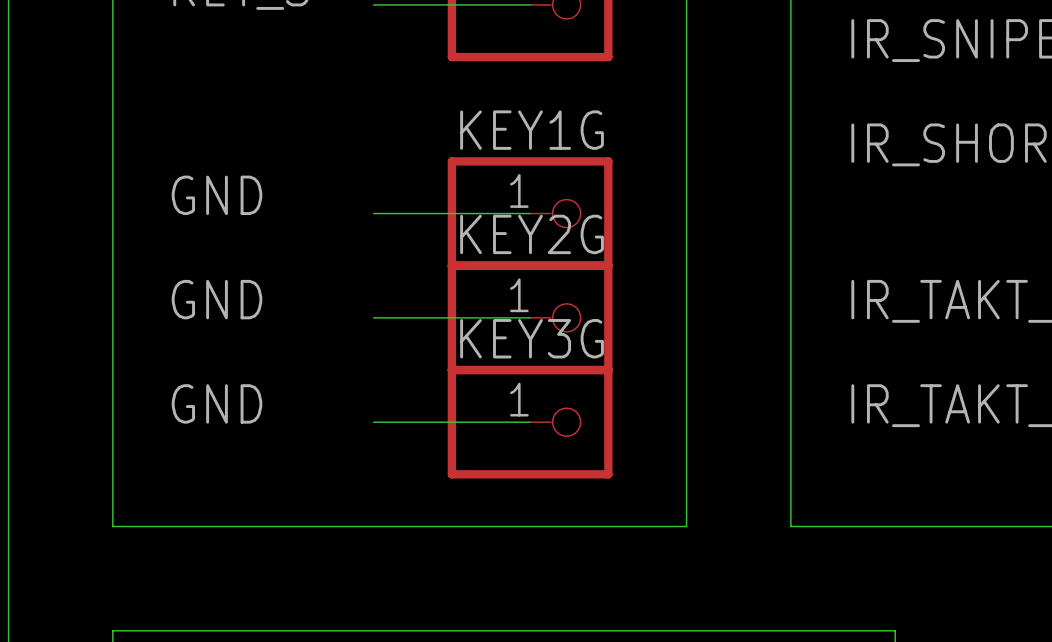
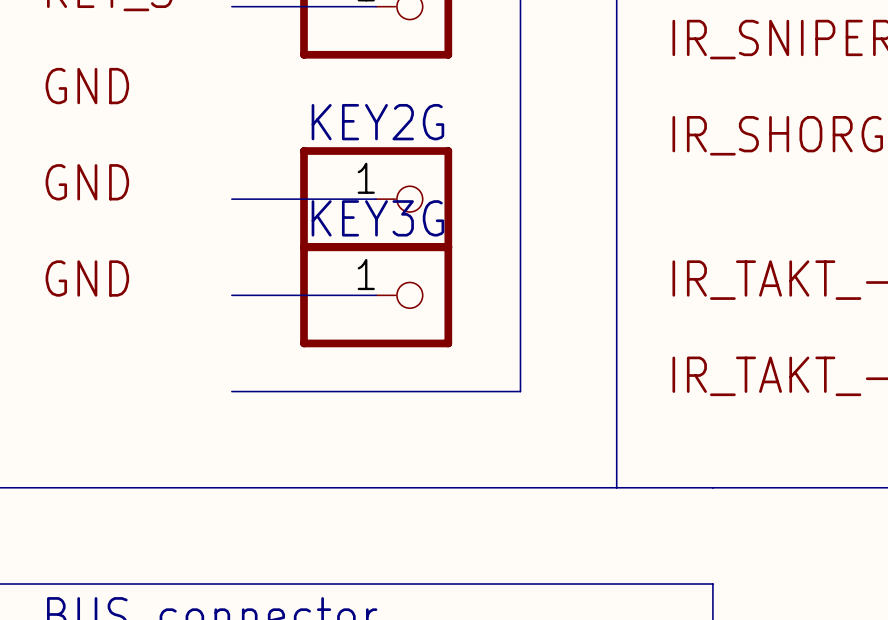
KEY1G name: KEY1G (532, 130) -> KEY2G (377, 122)
KEY2G name: KEY2G (532, 234) -> KEY3G (377, 218)
label position: GND (217, 403) -> GND (87, 86)
wire: none -> (376, 391) (520, 391)
KEY3G: (530, 422) -> none
wire: (686, 422) (686, 526) -> (616, 487) (520, 487)

